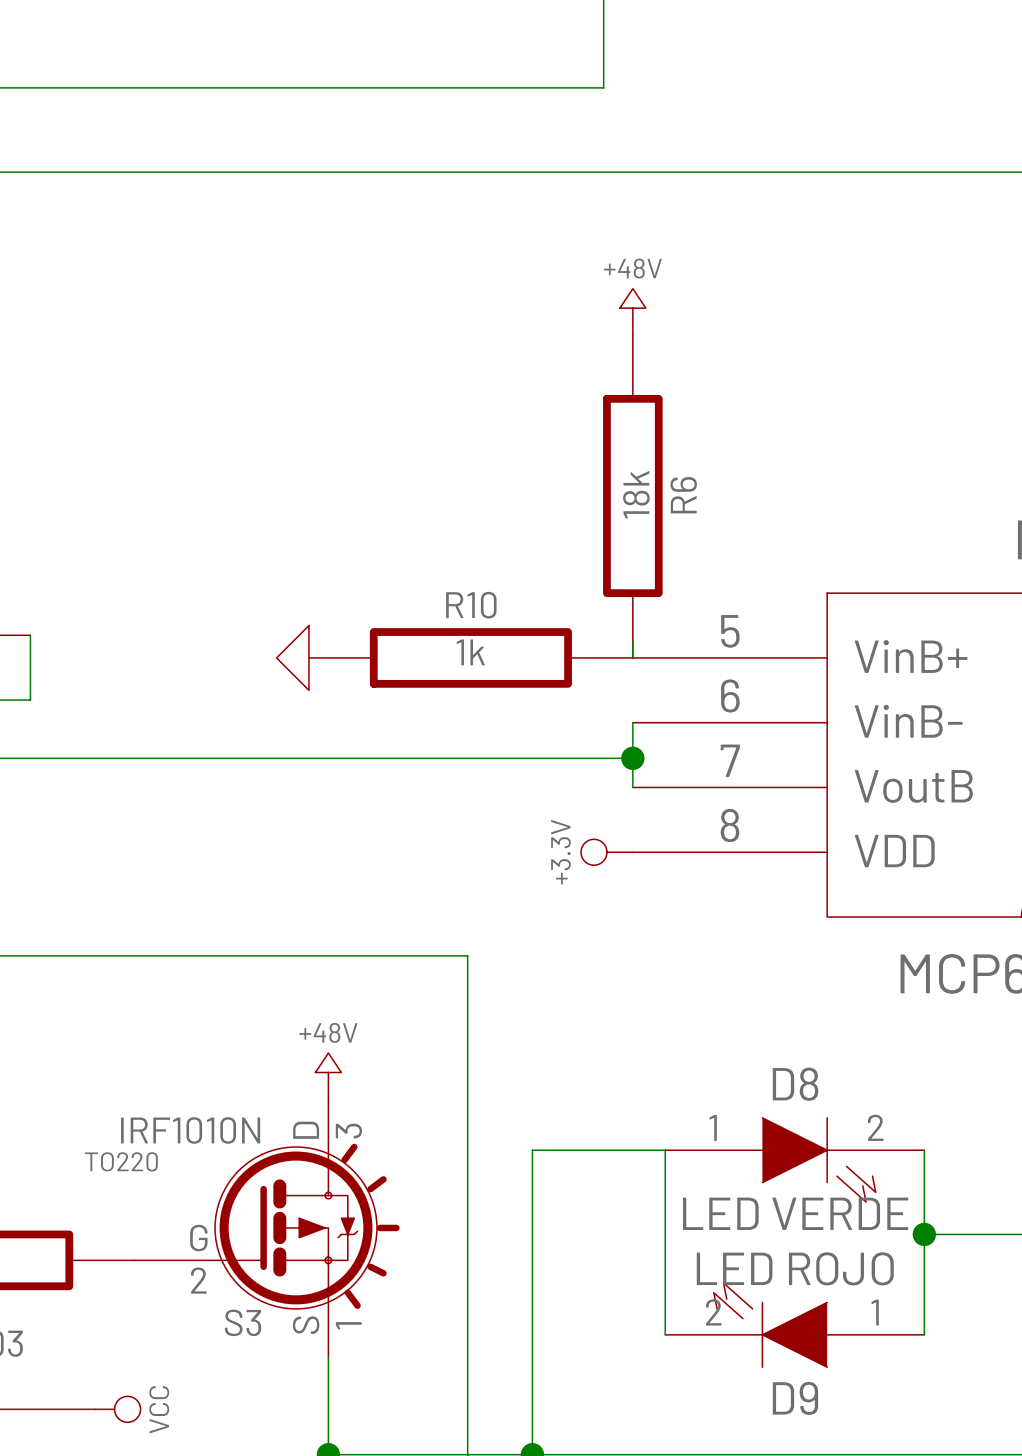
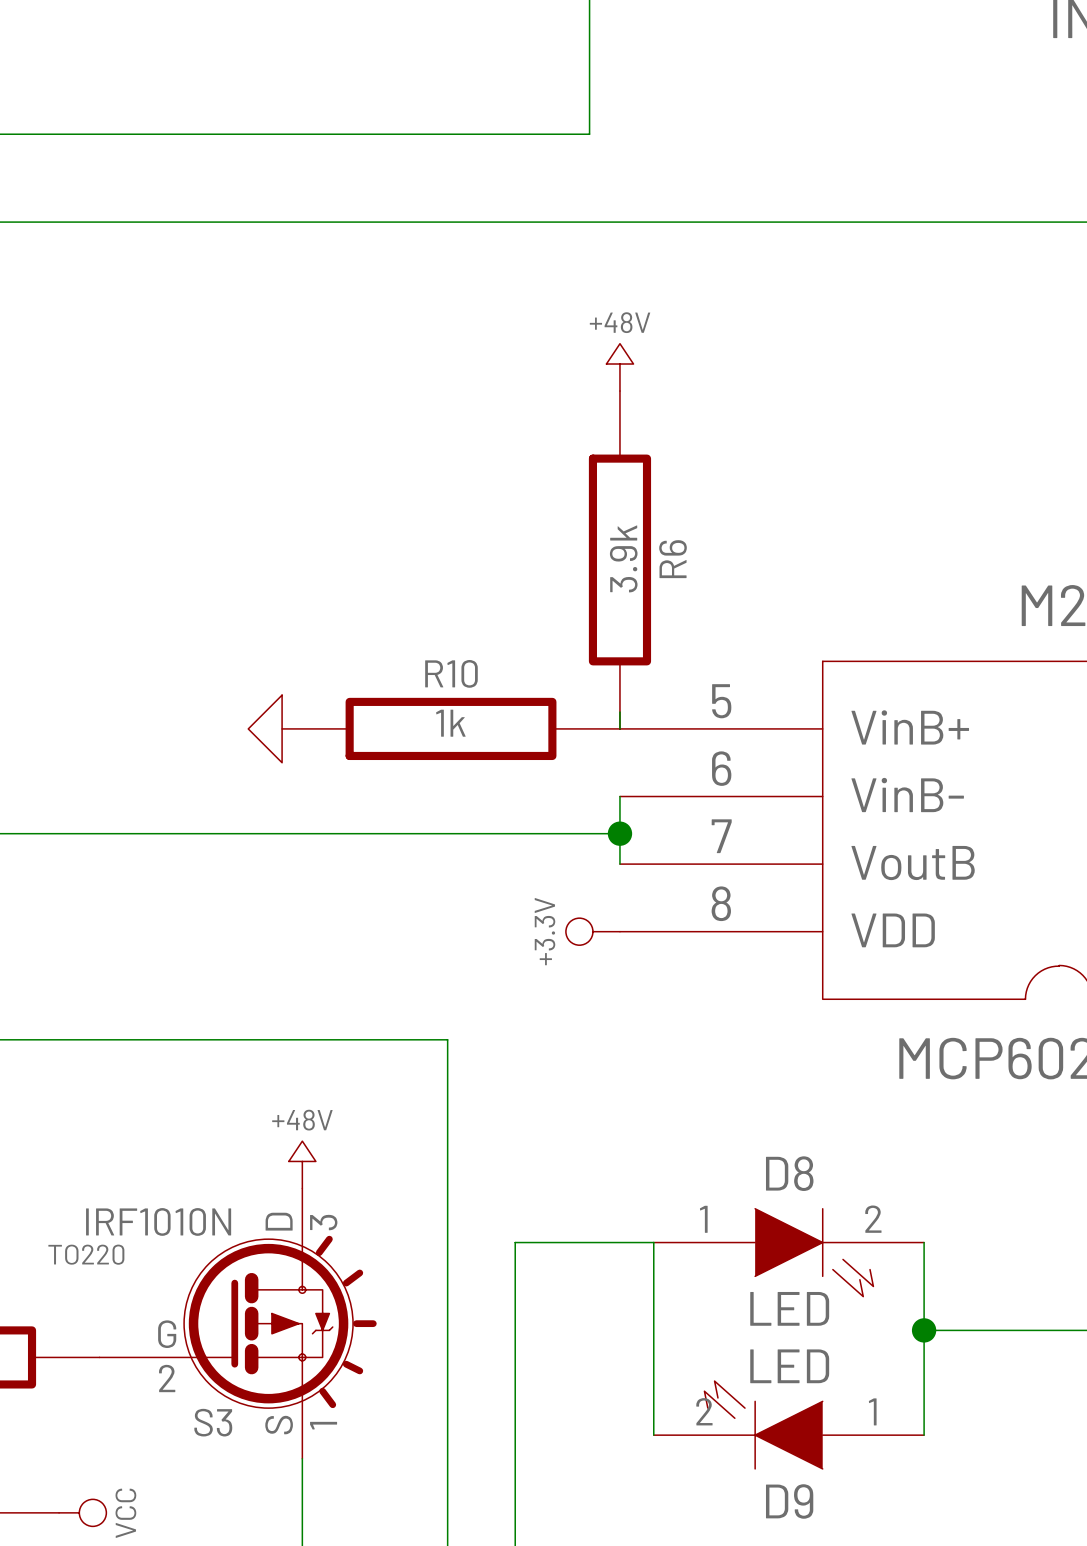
R6 value: 18k (636, 494) -> 3.9k (623, 558)
D8 value: LED VERDE (795, 1213) -> LED (789, 1308)
D9 value: LED ROJO (795, 1268) -> LED (789, 1366)

